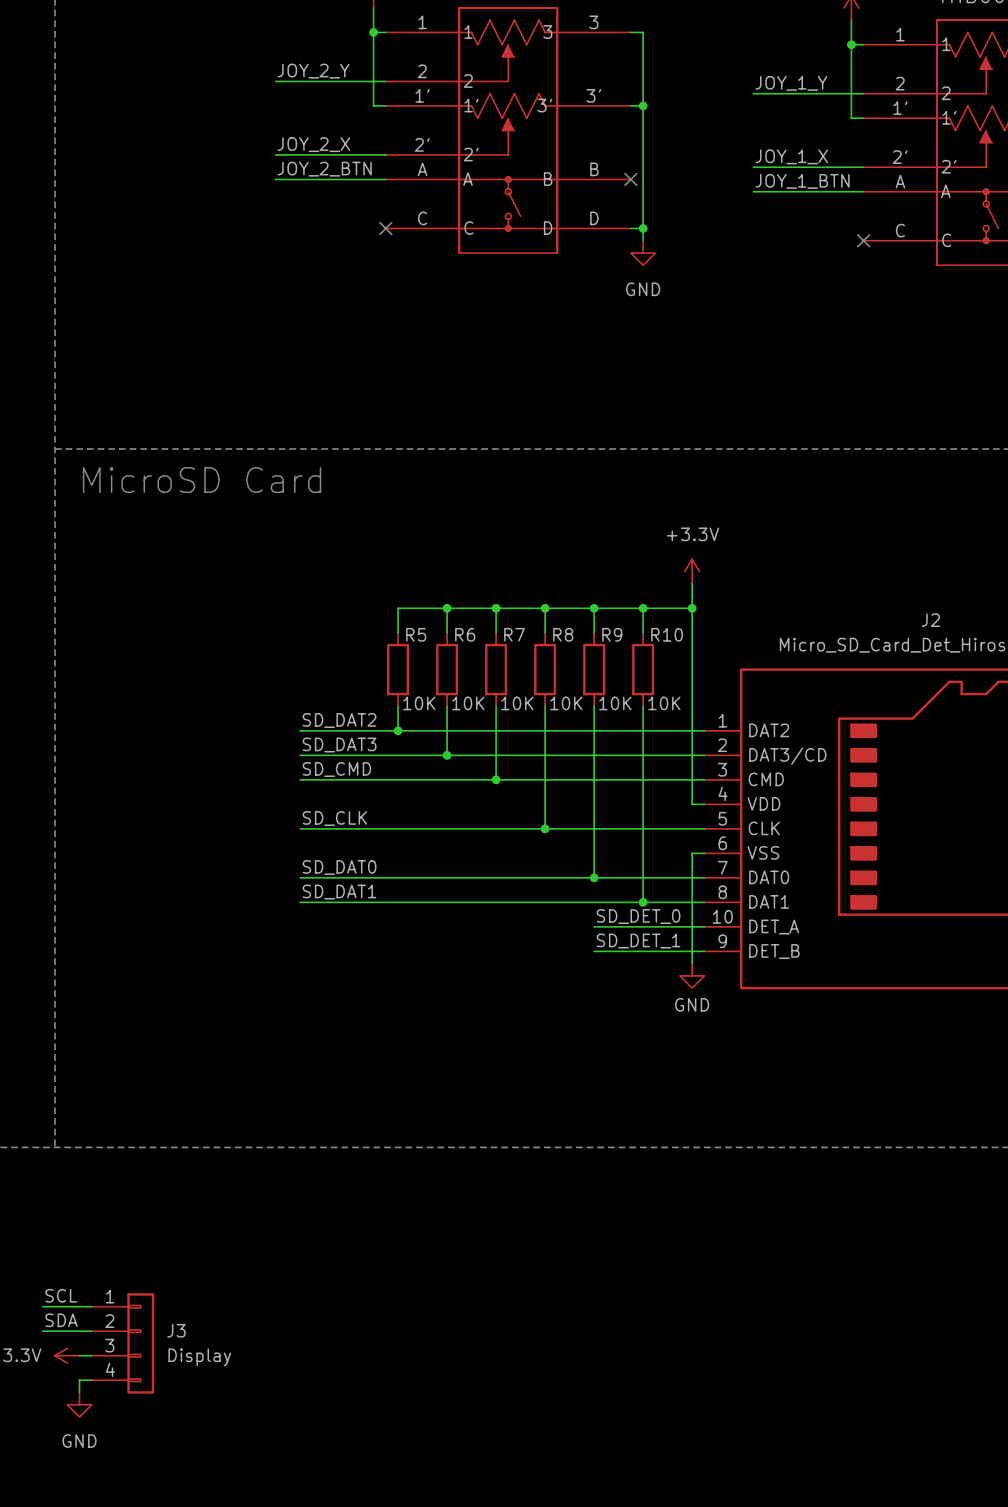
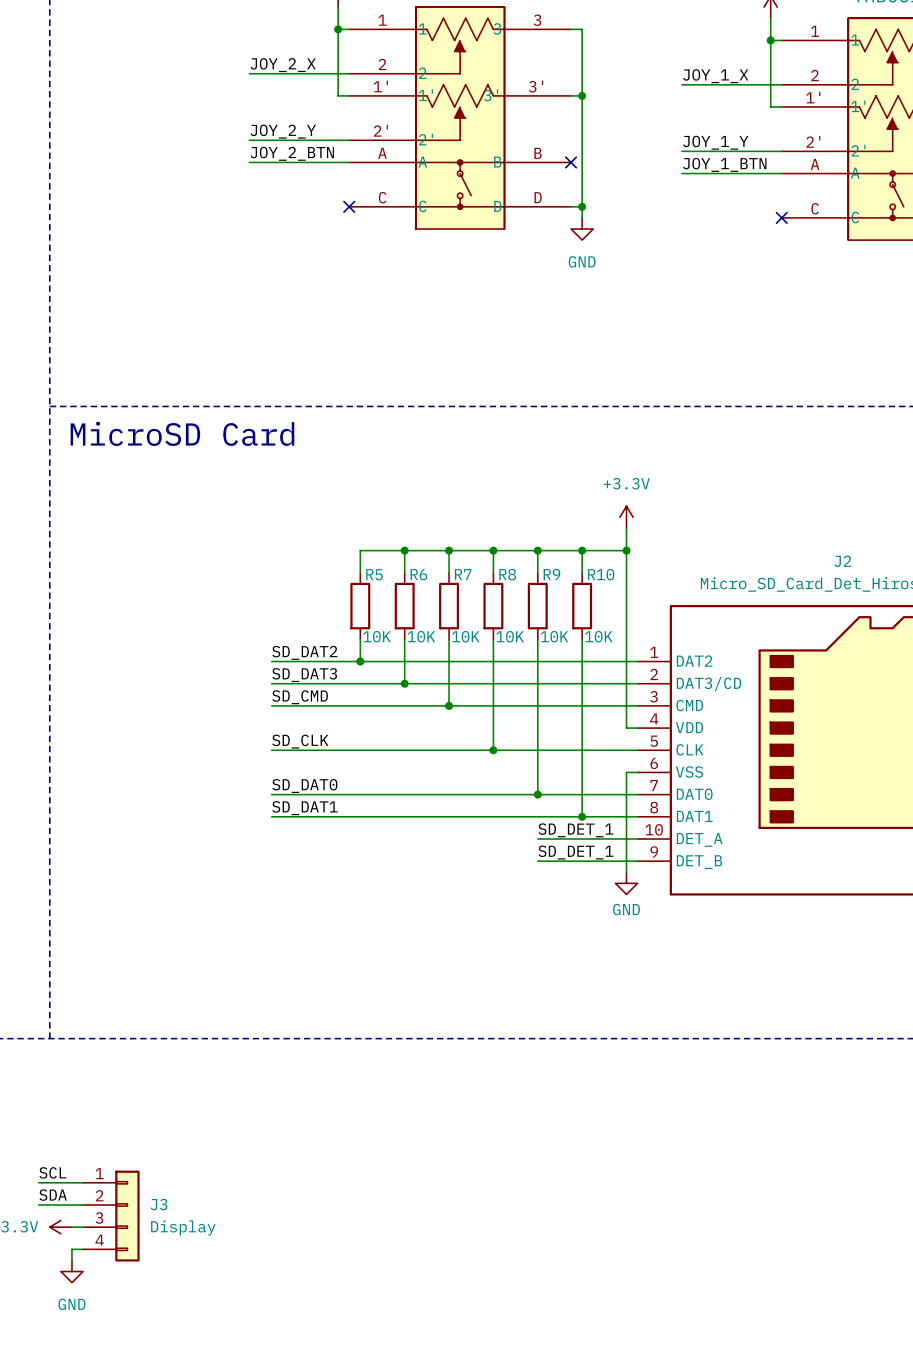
label: JOY_2_Y (313, 71) -> JOY_2_X (283, 65)
label: JOY_1_Y (791, 83) -> JOY_1_X (715, 76)
label: JOY_2_X (313, 144) -> JOY_2_Y (283, 131)
label: JOY_1_X (791, 156) -> JOY_1_Y (715, 142)
label: SD_DET_0 (638, 916) -> SD_DET_1 (575, 830)

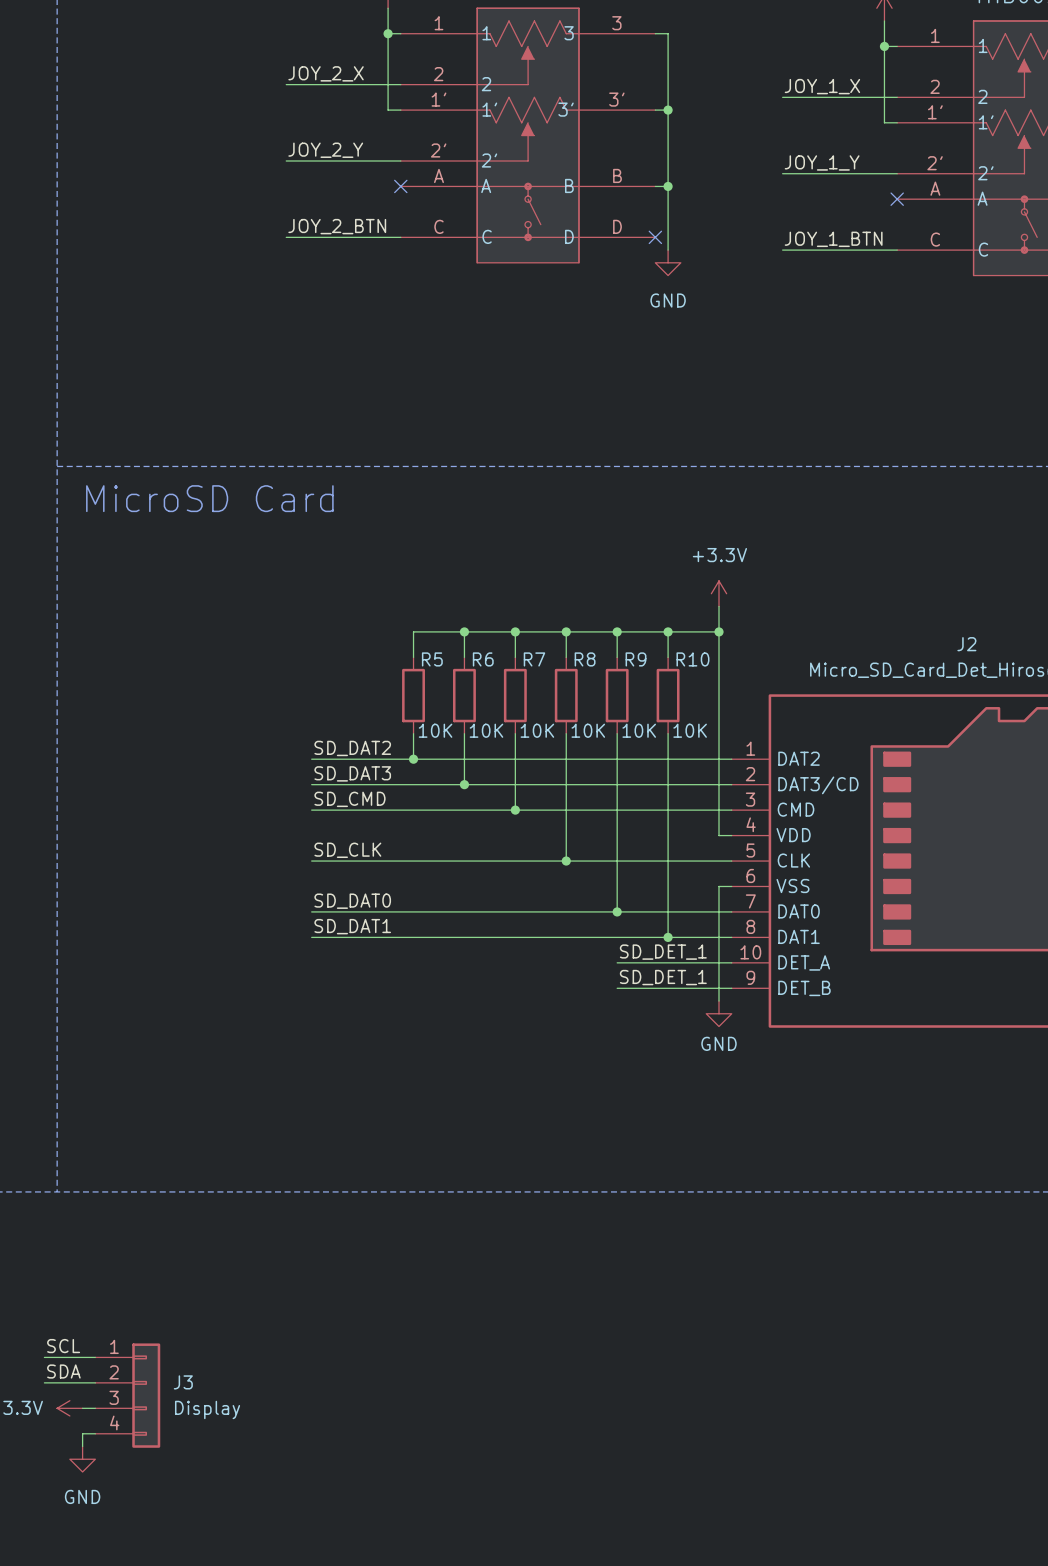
label position: JOY_2_BTN (292, 153) -> JOY_2_BTN (337, 226)
wire: (249, 162) (349, 162) -> (286, 237) (400, 237)
no-connect mark position: (571, 162) -> (655, 237)
label position: JOY_1_BTN (724, 164) -> JOY_1_BTN (833, 239)
wire: (681, 173) (781, 173) -> (782, 250) (897, 250)
no-connect mark position: (349, 206) -> (400, 186)
wire: (571, 206) (582, 206) -> (655, 186) (668, 186)
junction position: (582, 206) -> (668, 186)
no-connect mark position: (781, 217) -> (897, 199)

